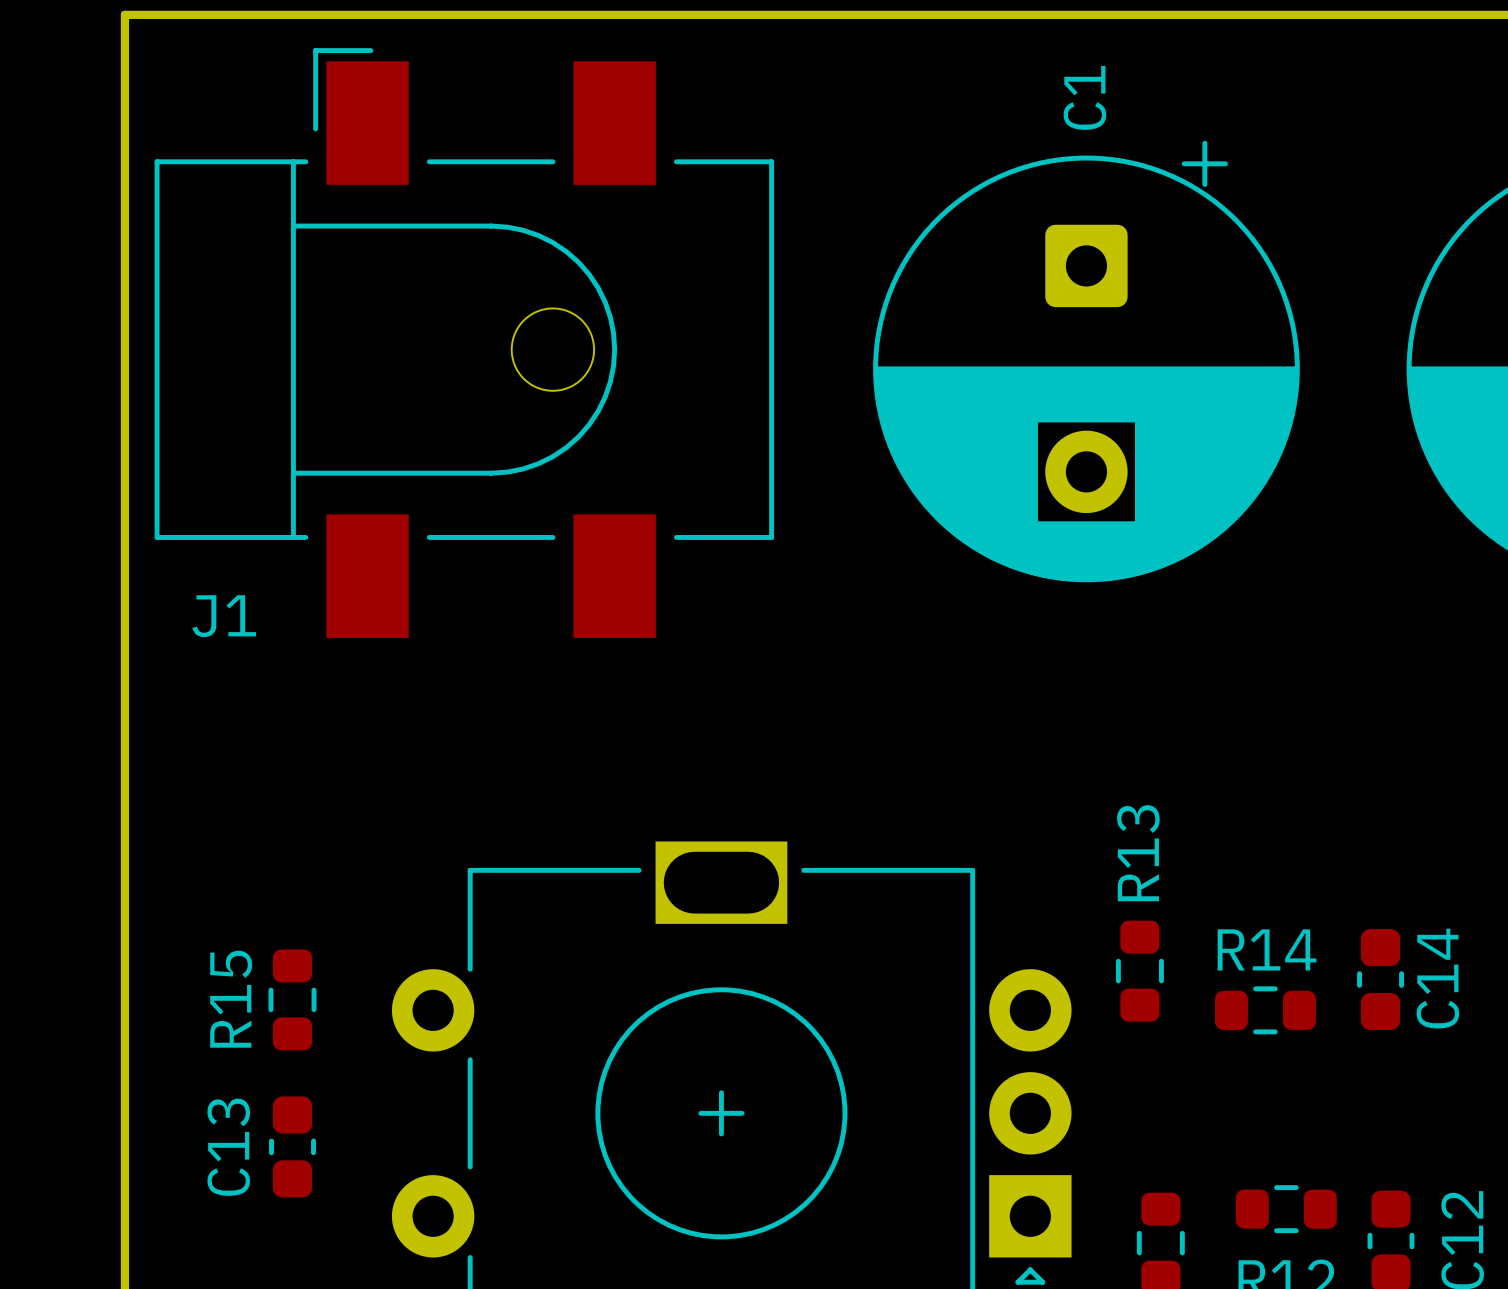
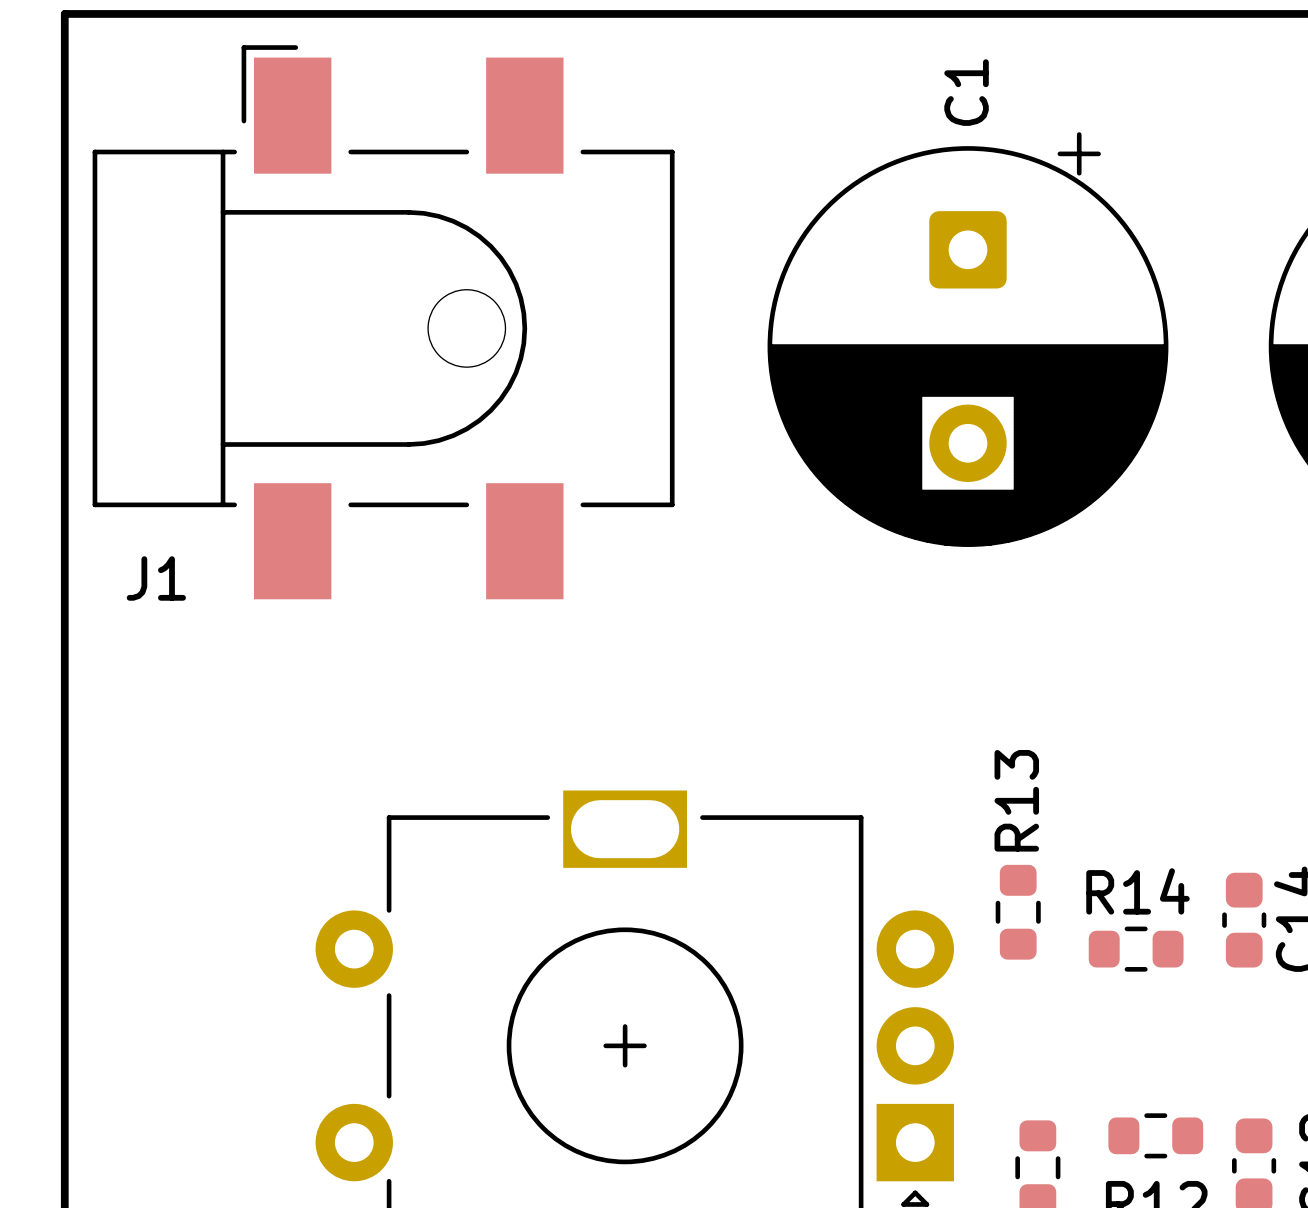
R15: (292, 999) -> none
C13: (292, 1146) -> none

